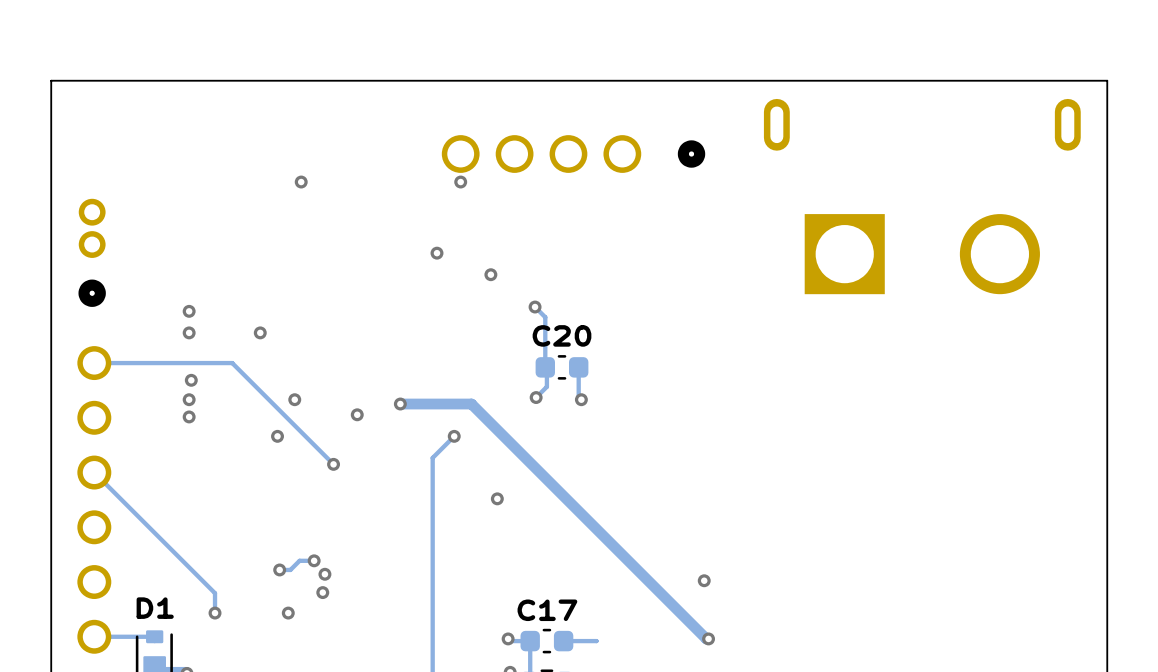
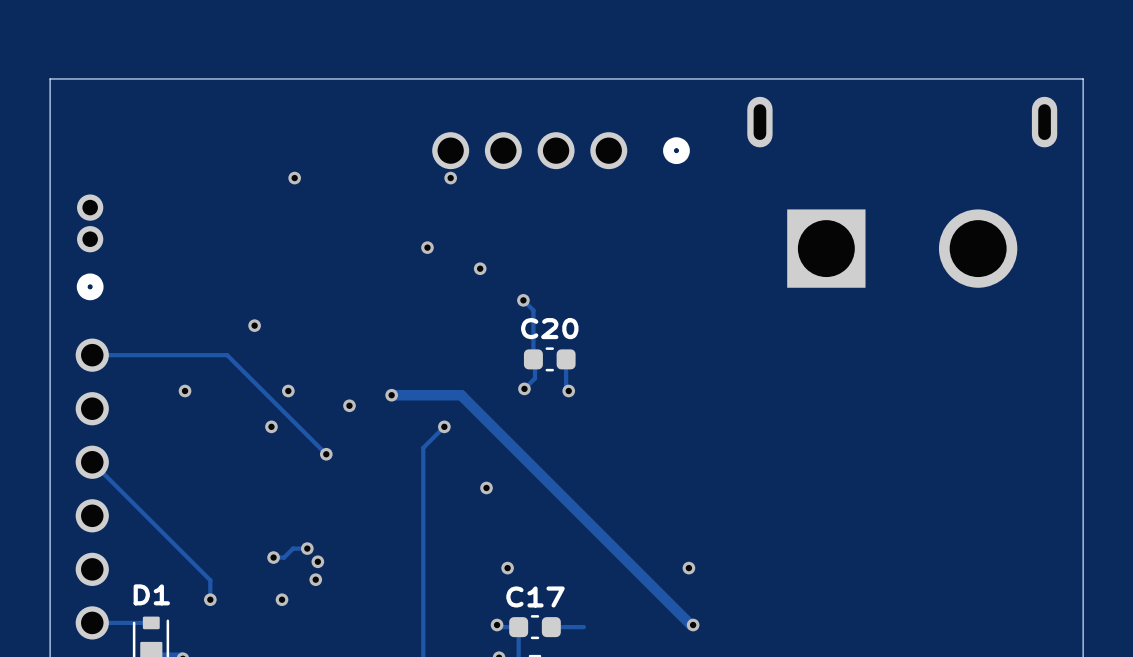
via: (189, 311) -> none
via: (189, 332) -> none
via: (191, 380) -> none
via: (189, 416) -> none
via: none -> (507, 568)

